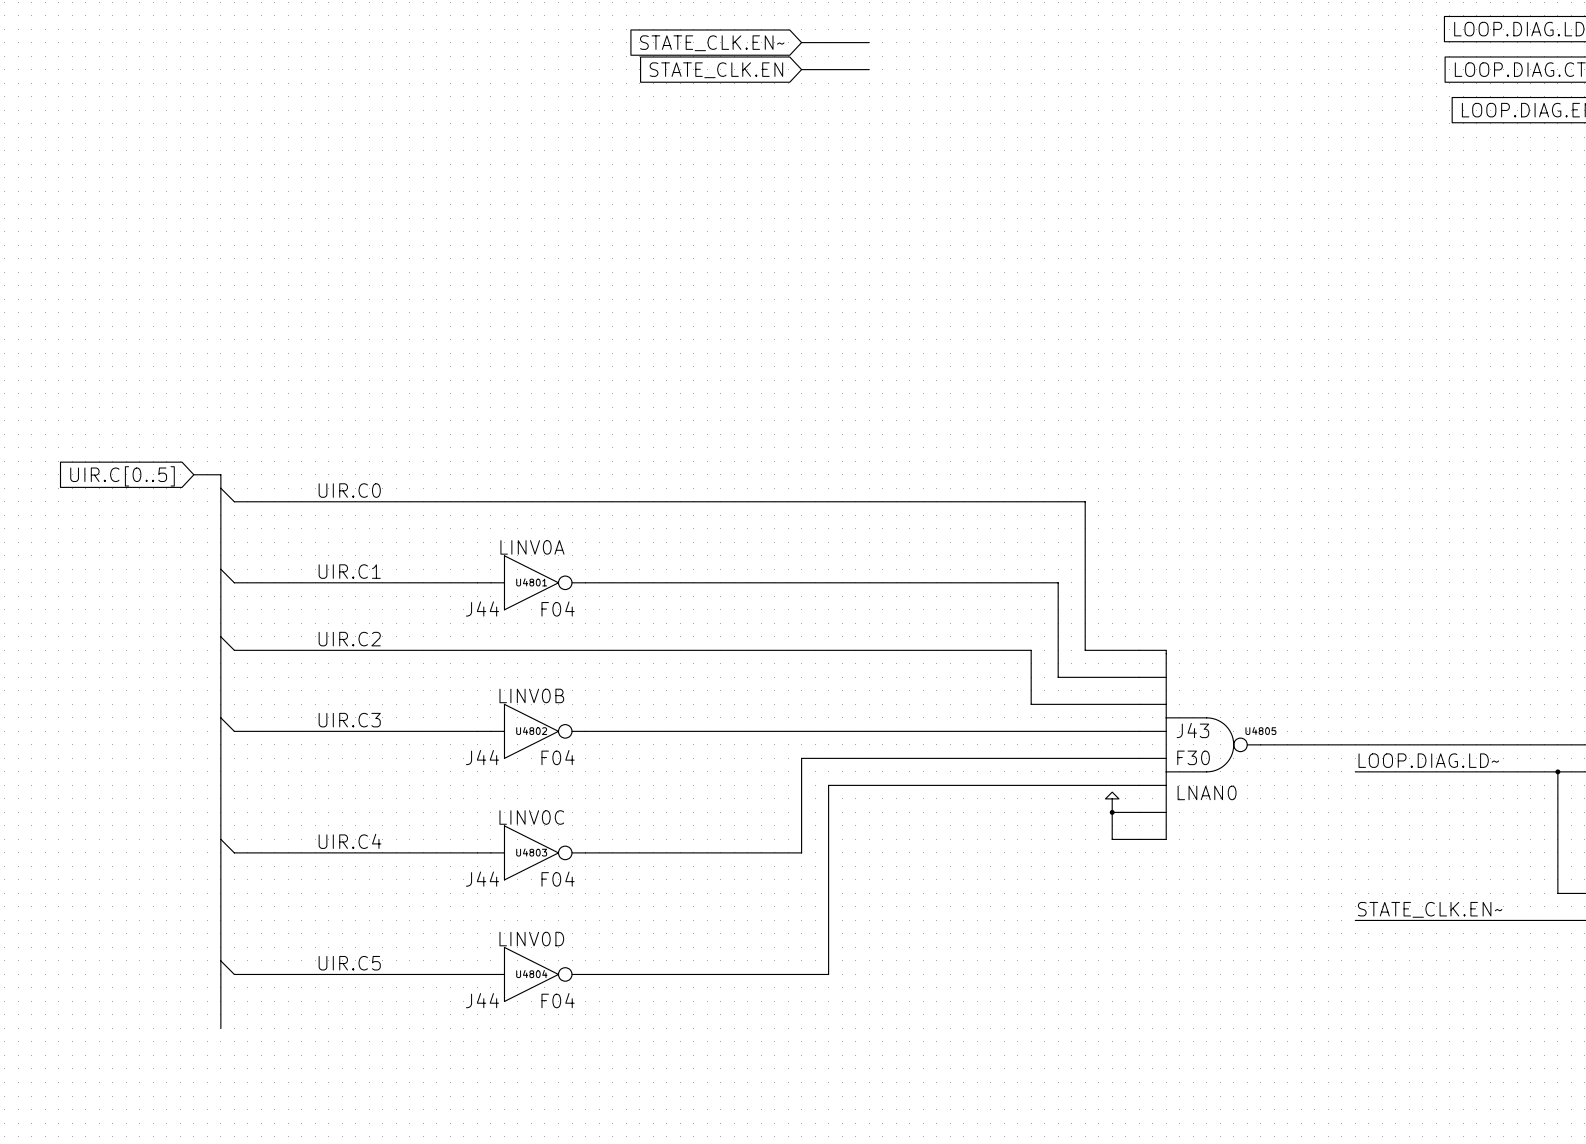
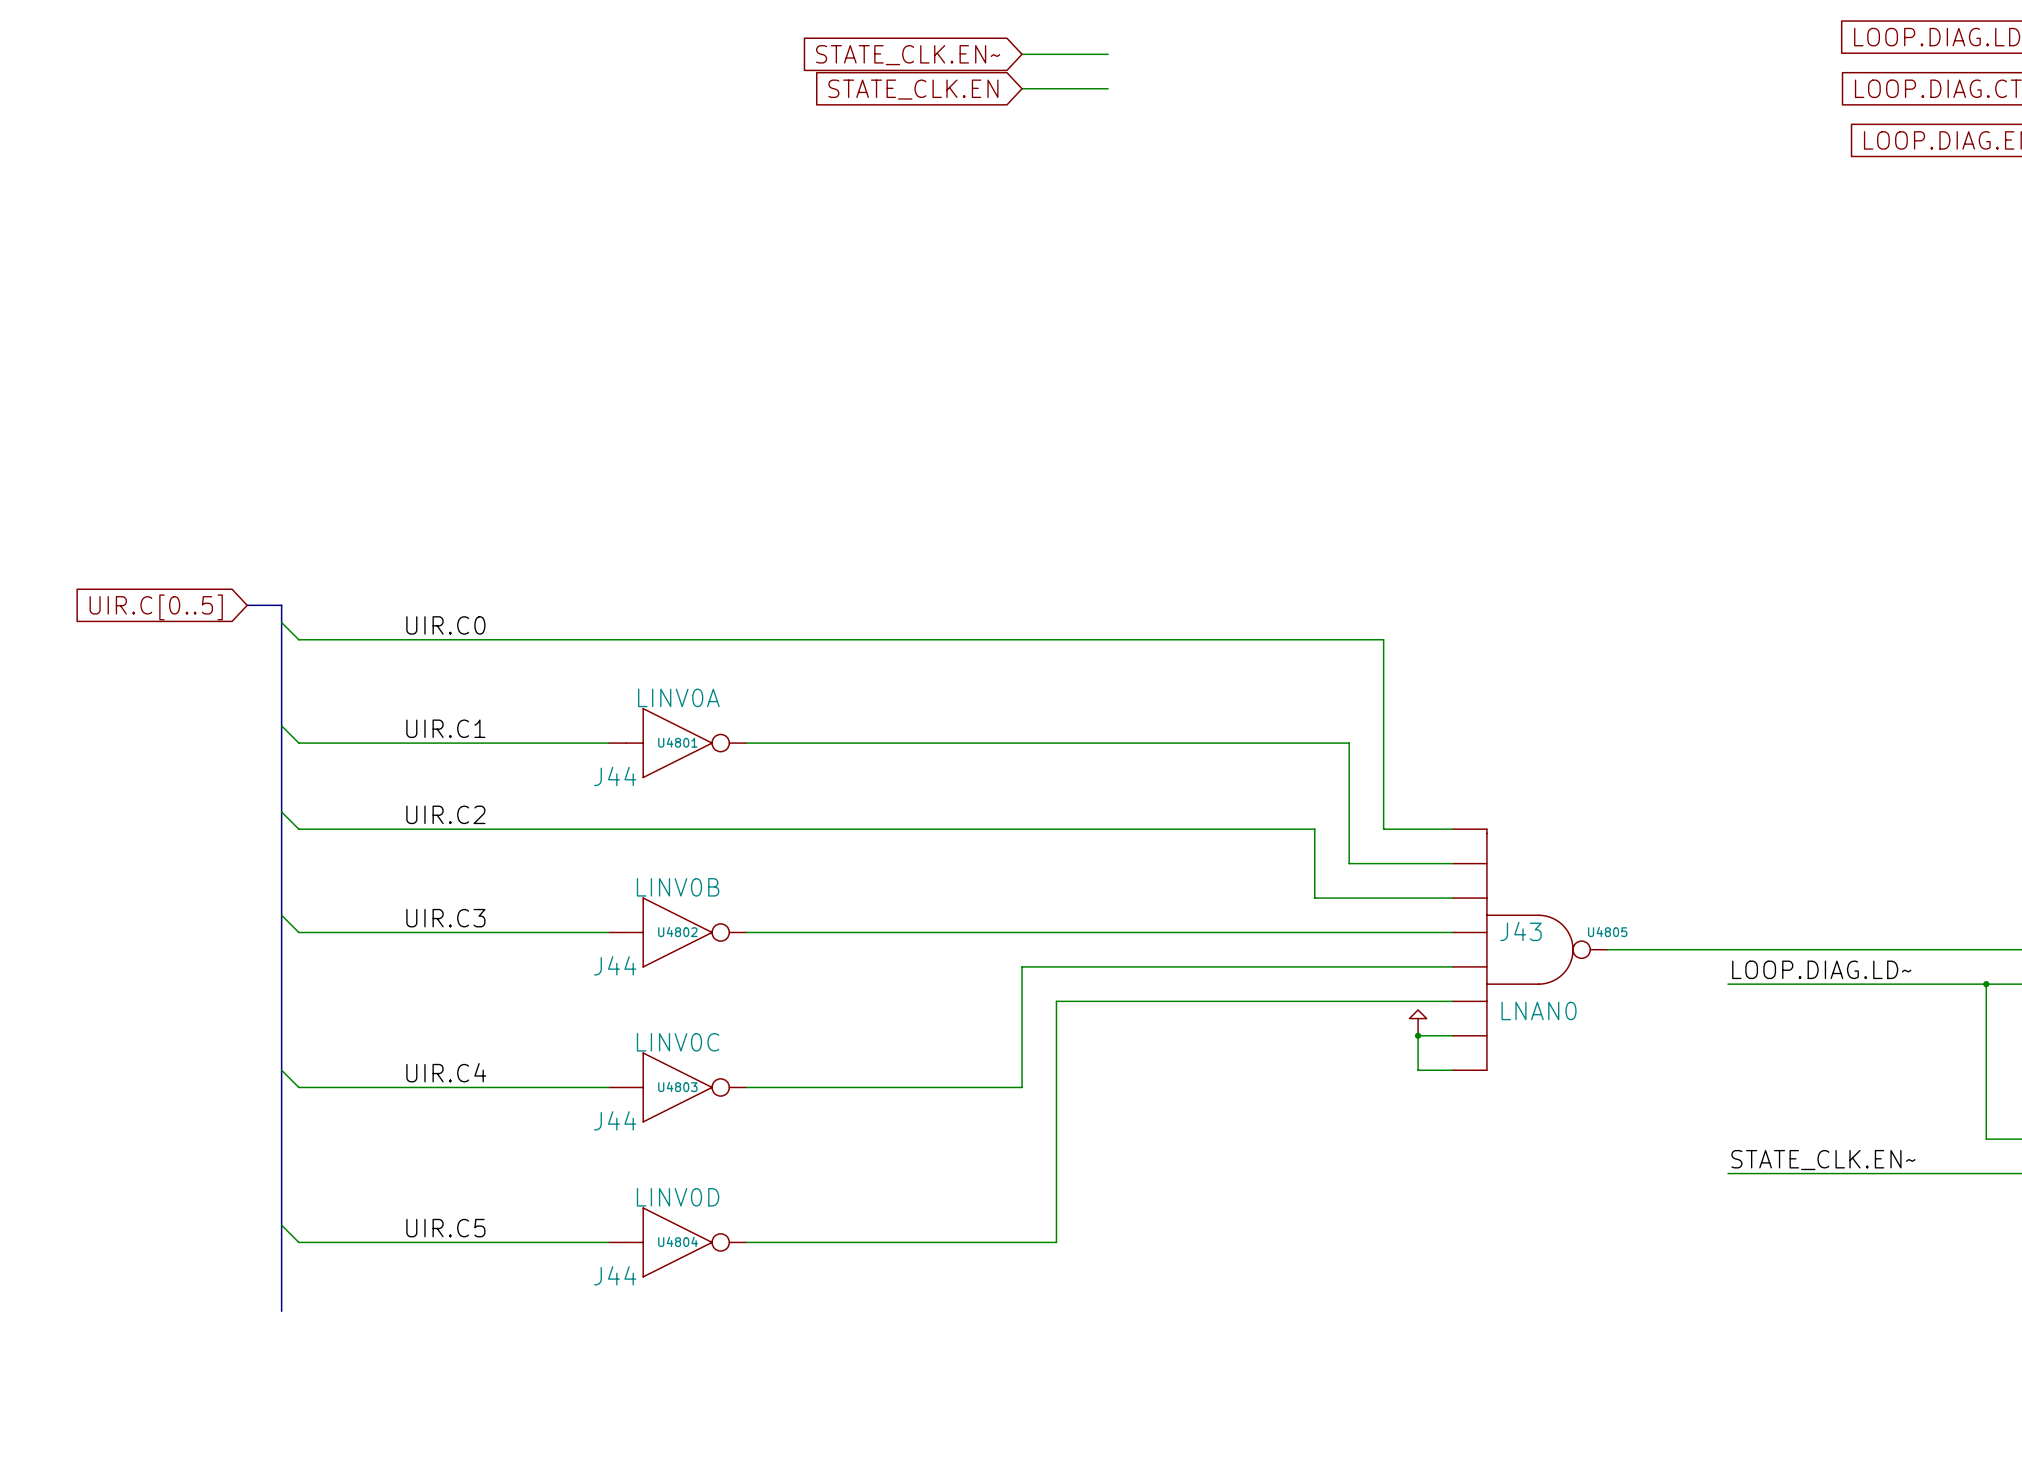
U4801 value: F04 (558, 608) -> none
U4802 value: F04 (558, 757) -> none
U4805 value: F30 (1193, 757) -> none
U4803 value: F04 (558, 879) -> none
U4804 value: F04 (558, 1000) -> none

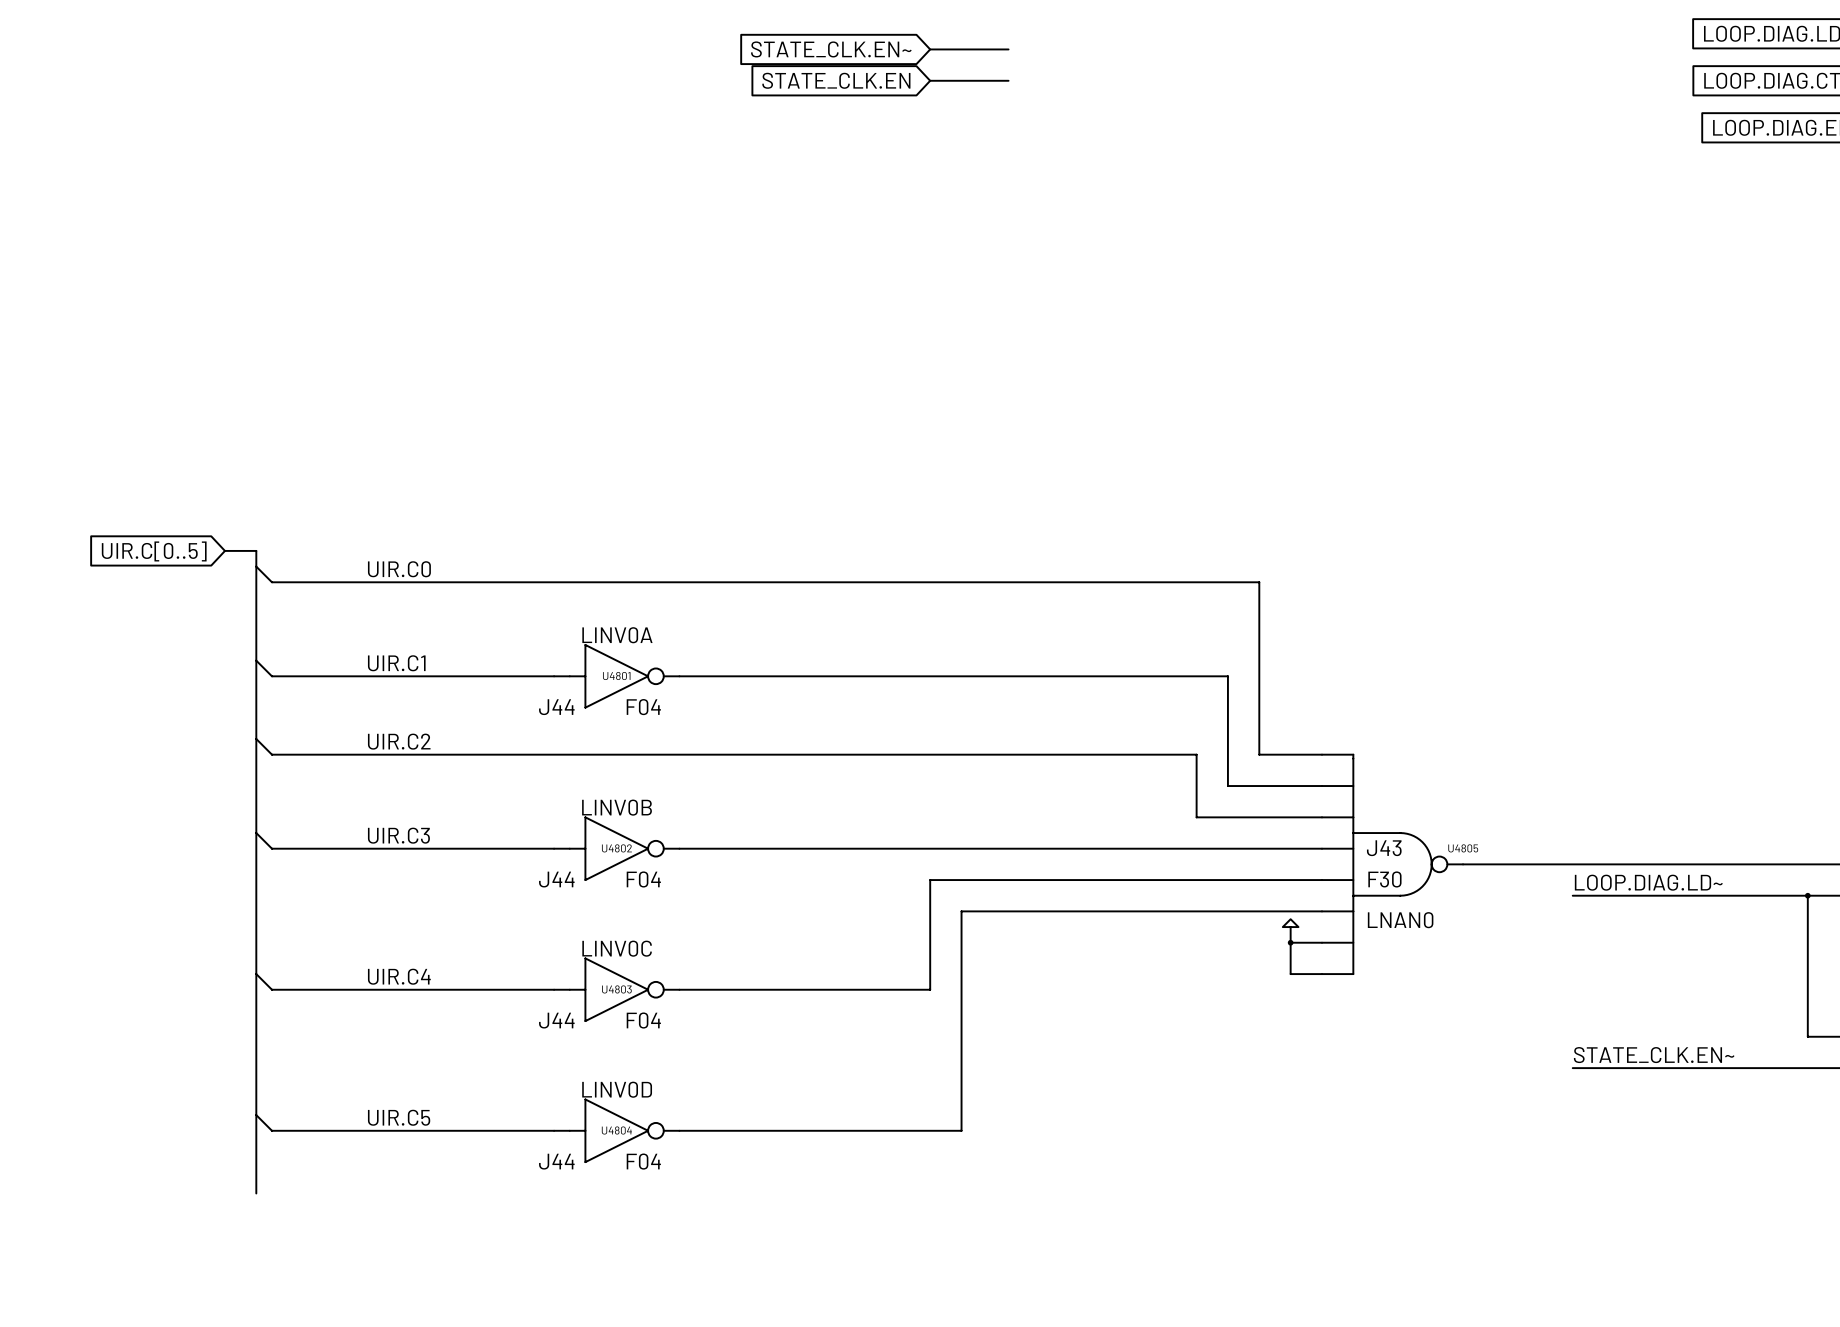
U4801 value: none -> F04 (643, 707)
U4802 value: none -> F04 (643, 879)
U4805 value: none -> F30 (1384, 879)
U4803 value: none -> F04 (643, 1020)
U4804 value: none -> F04 (643, 1161)

